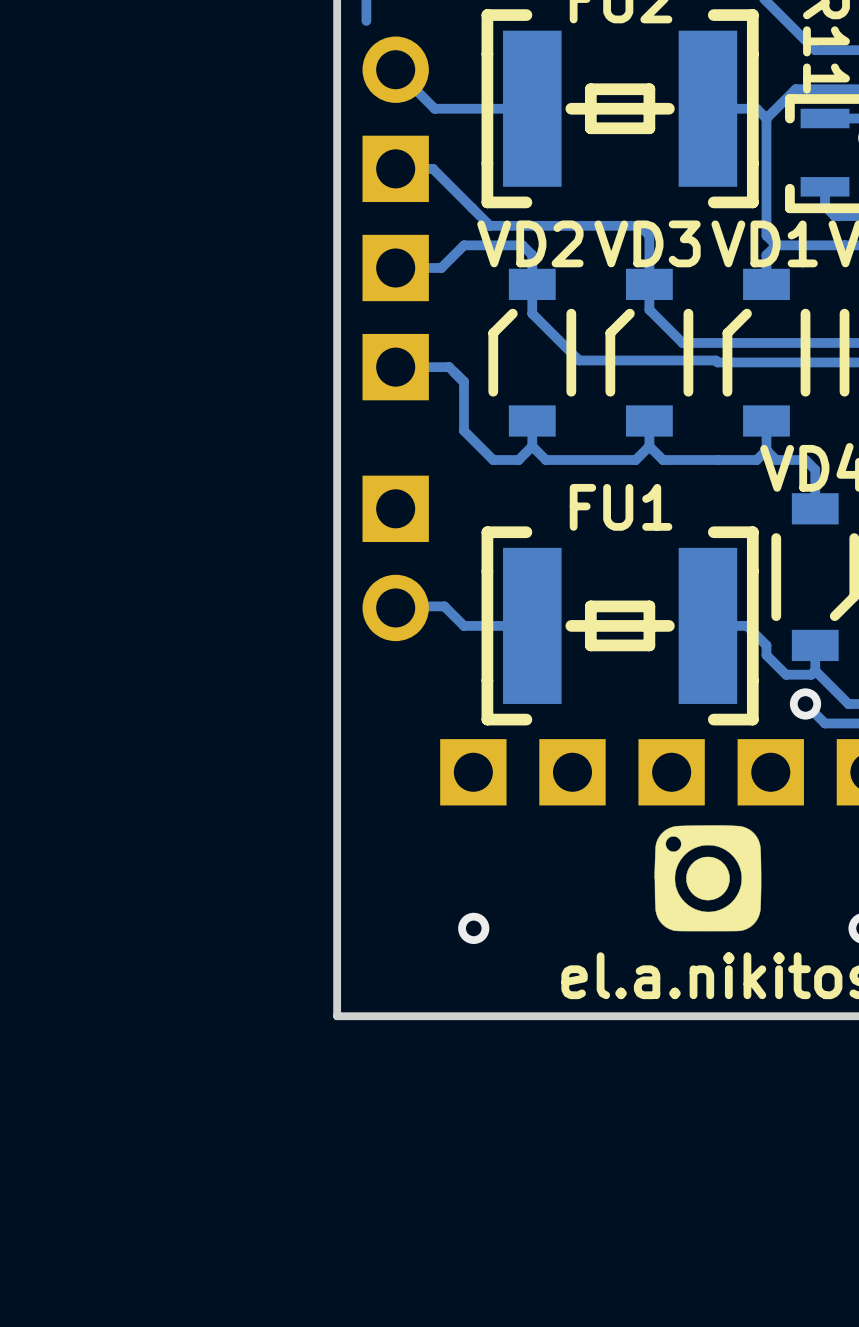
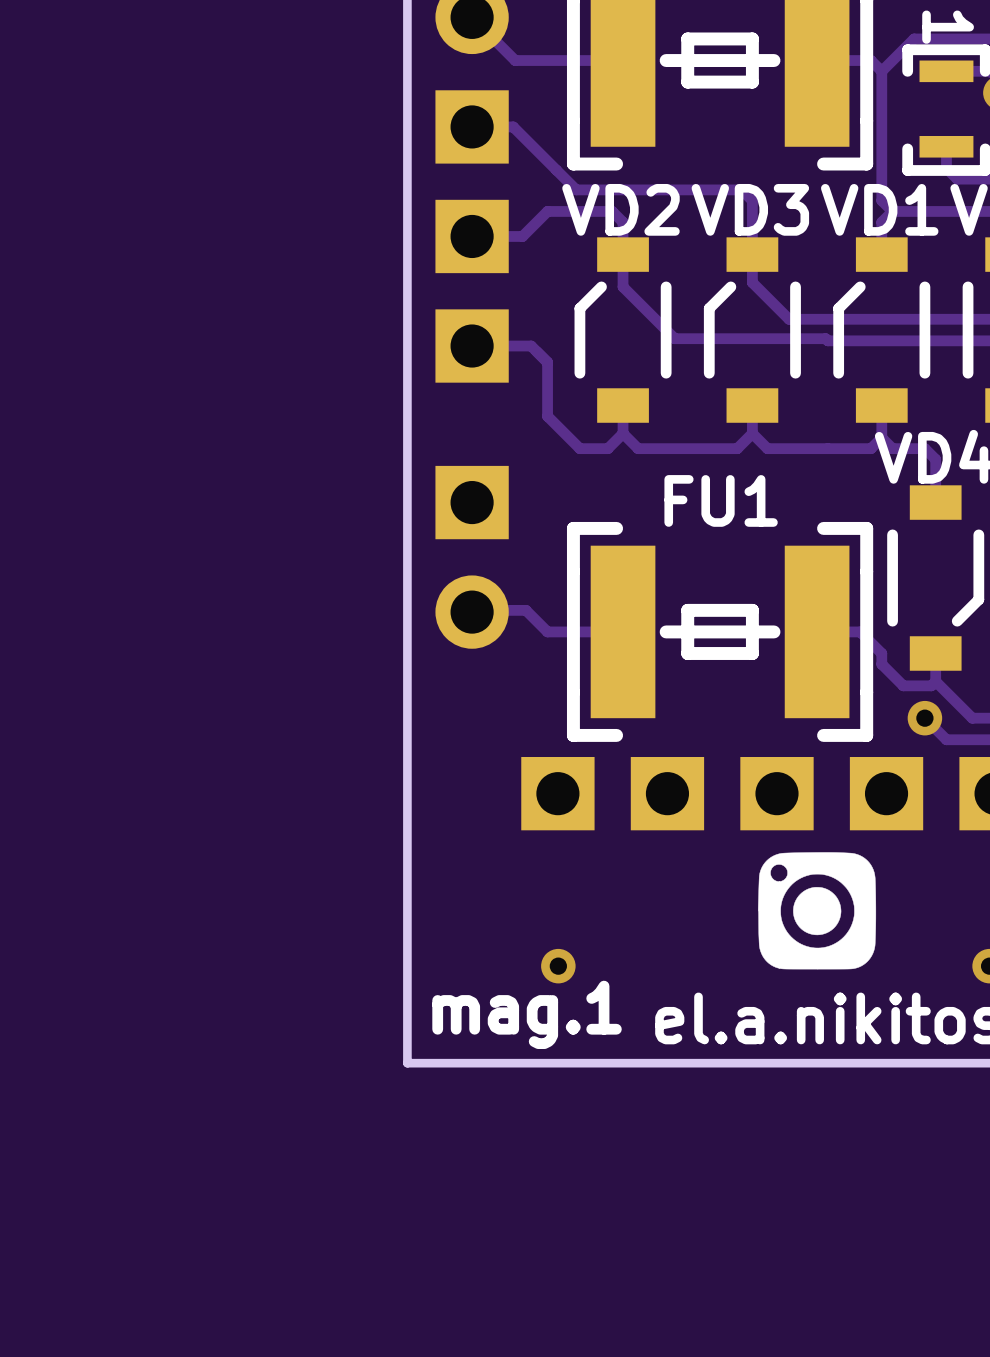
text: none -> mag.1 (527, 1014)

